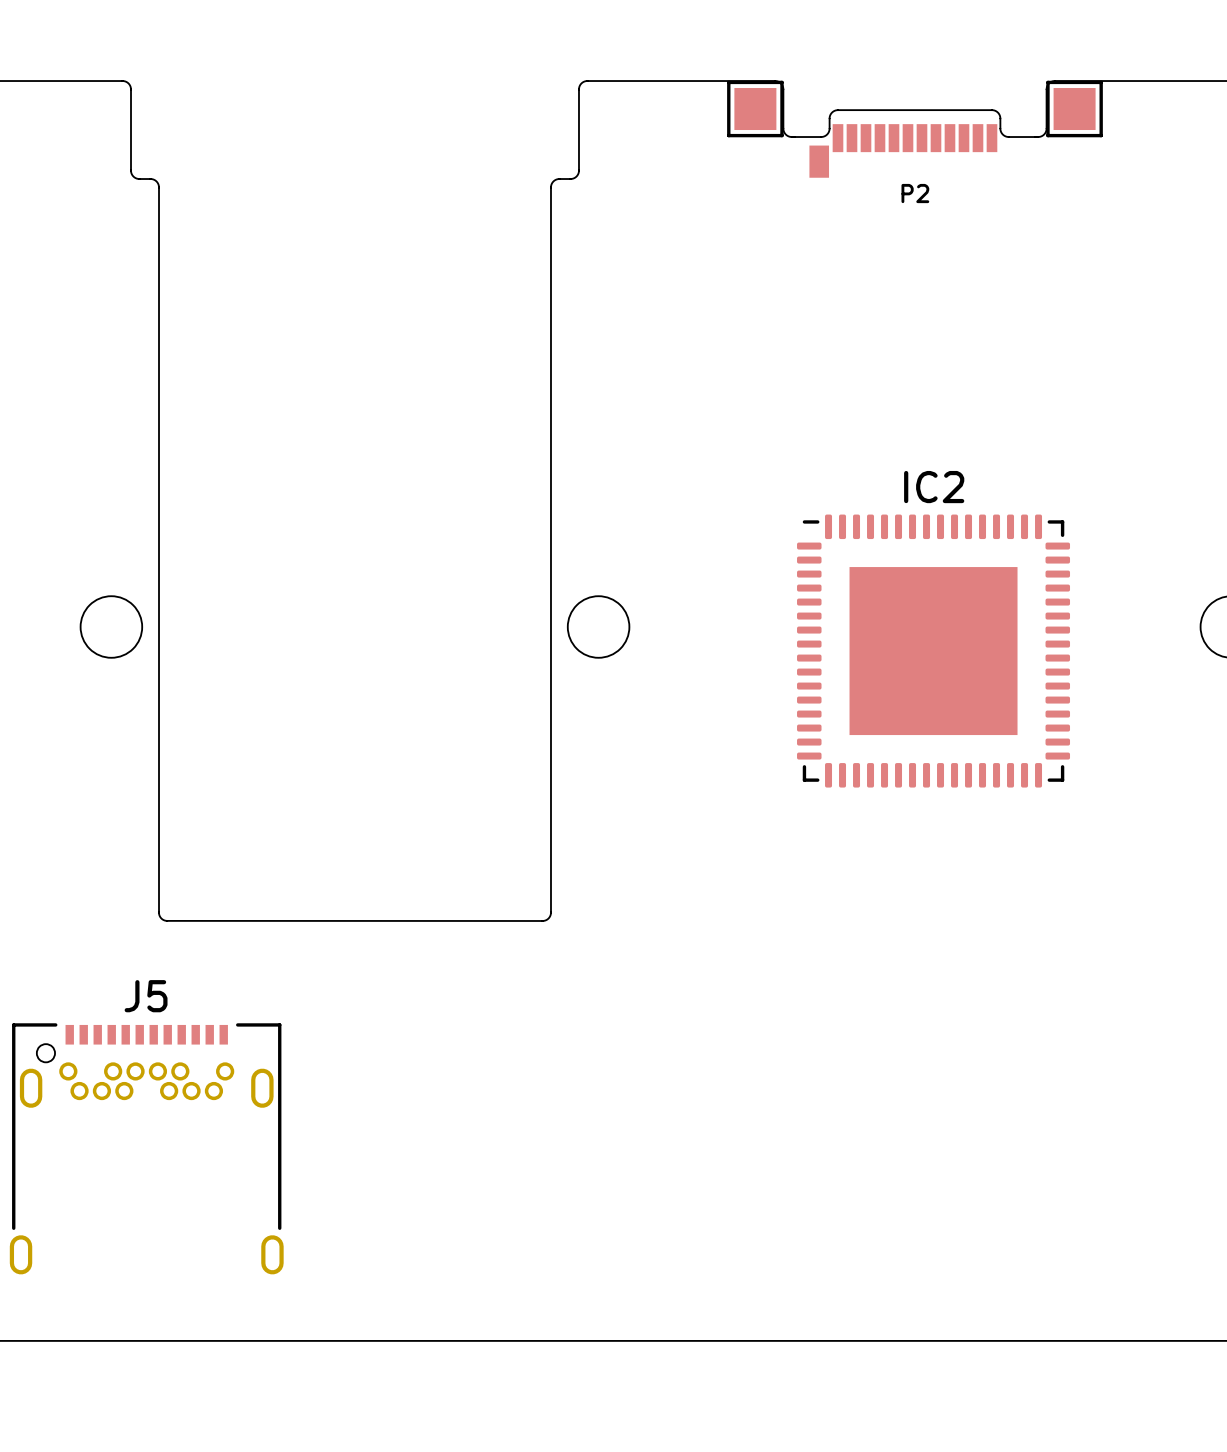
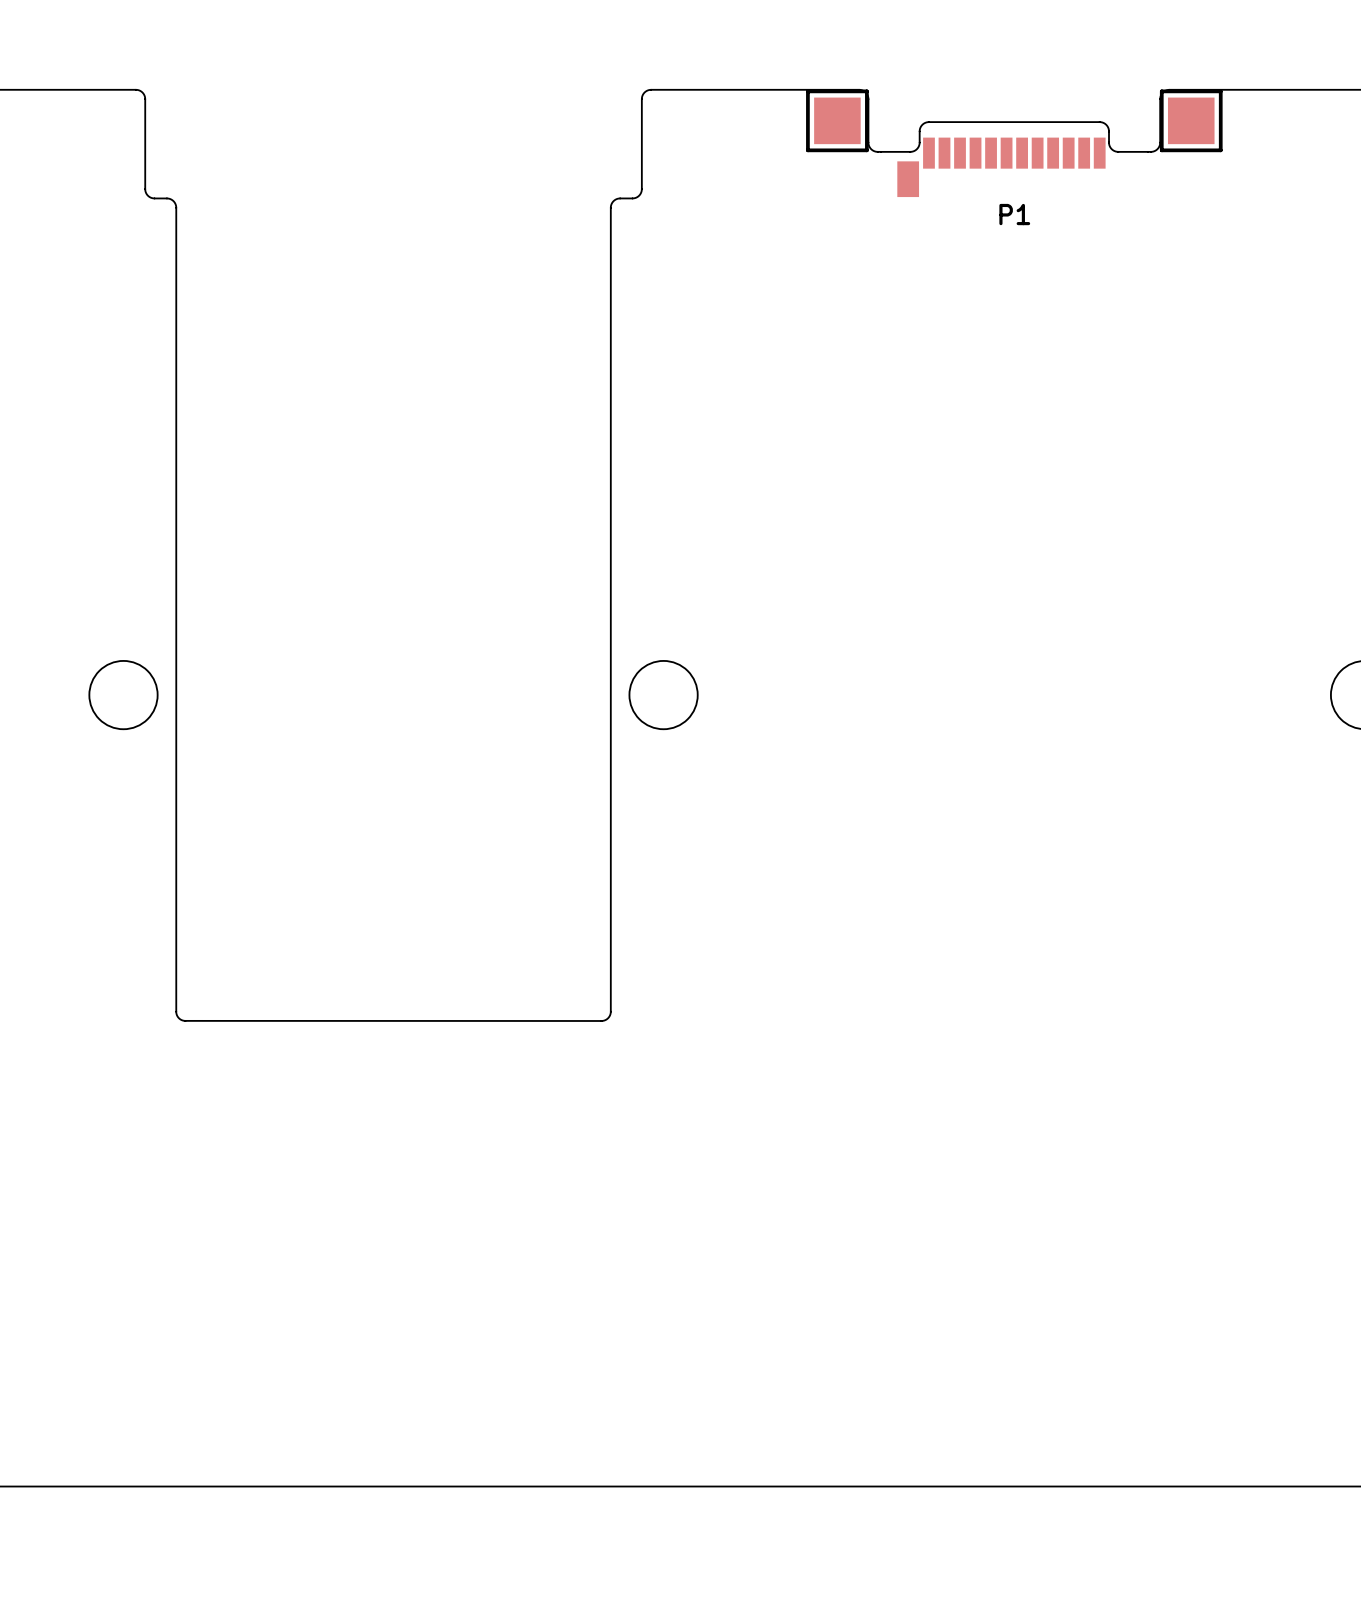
P2 name: P2 (915, 193) -> P1 (1014, 214)
IC2: (933, 651) -> none
J5: (146, 1148) -> none

